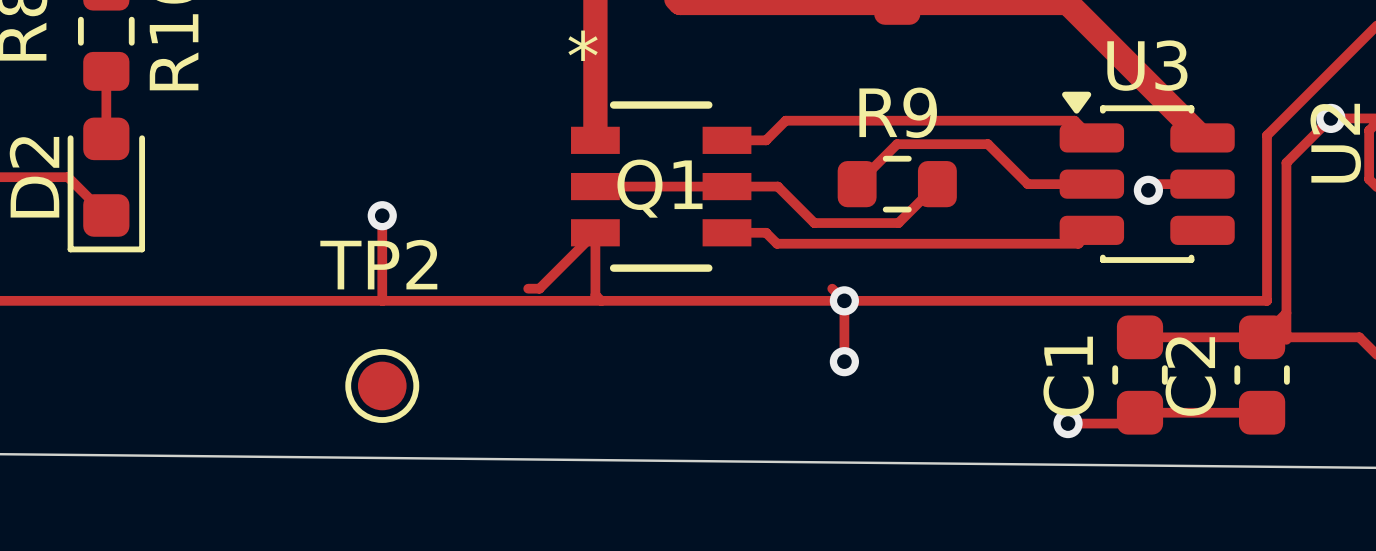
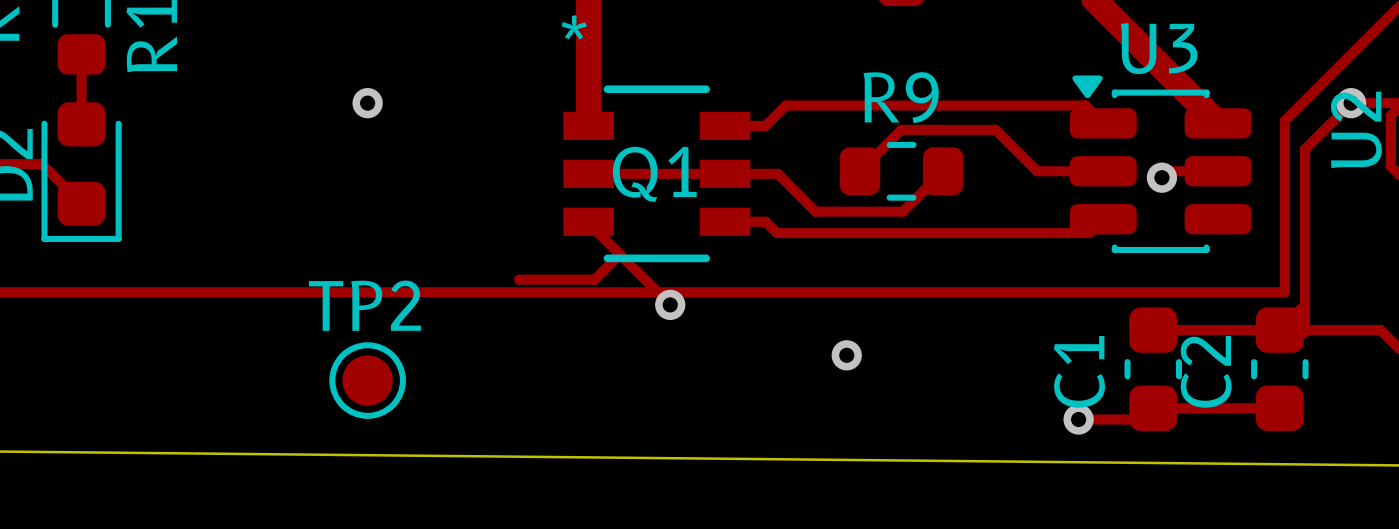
track: (382, 215) (382, 300) -> none
via position: (382, 215) -> (367, 103)
track: (595, 232) (539, 288) -> (619, 254) (594, 279) (530, 279)
track: (595, 234) (595, 295) (601, 300) -> (588, 223) (670, 304)
TP2 name position: TP2 (378, 264) -> TP2 (364, 305)
track: (832, 288) (844, 300) (844, 361) -> none
via: (844, 300) -> none
via: none -> (670, 304)

